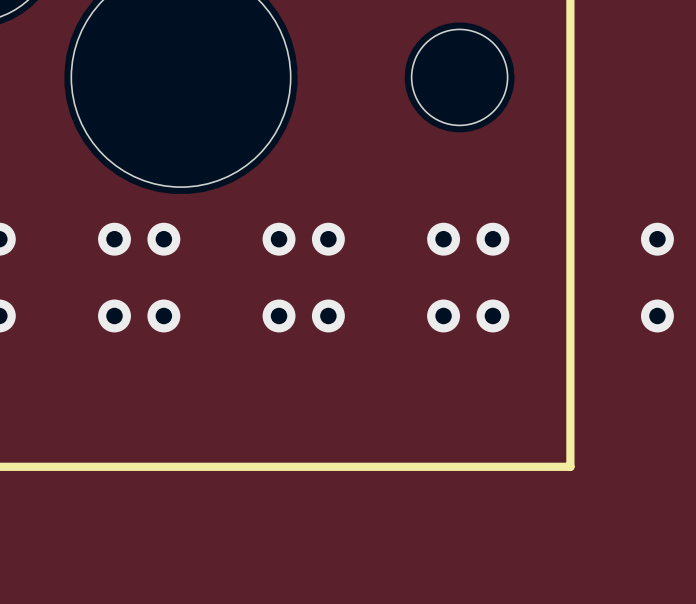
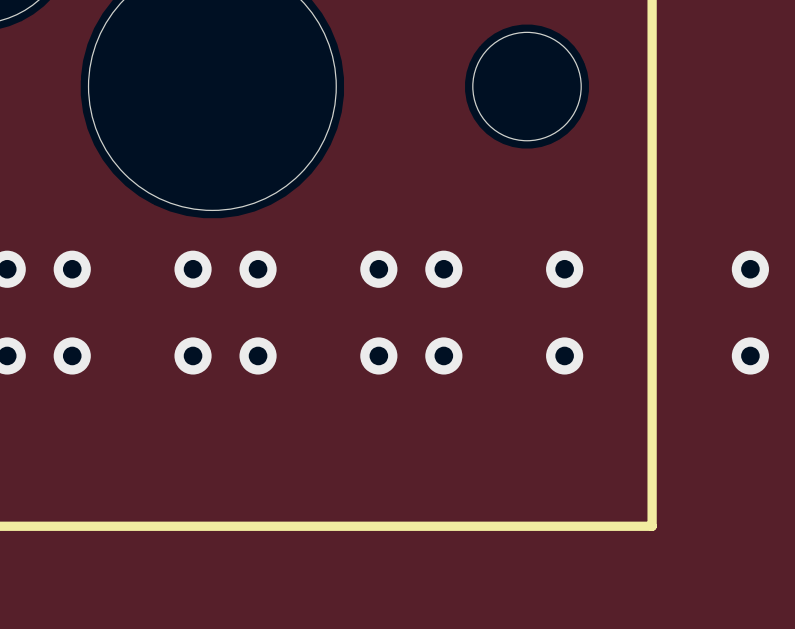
via: none -> (72, 269)
via: (114, 239) -> none
via: none -> (258, 269)
via: (279, 239) -> none
via: none -> (443, 269)
via: (443, 239) -> none
via: none -> (72, 355)
via: (114, 315) -> none
via: none -> (258, 355)
via: (279, 315) -> none
via: none -> (443, 355)
via: (443, 315) -> none

